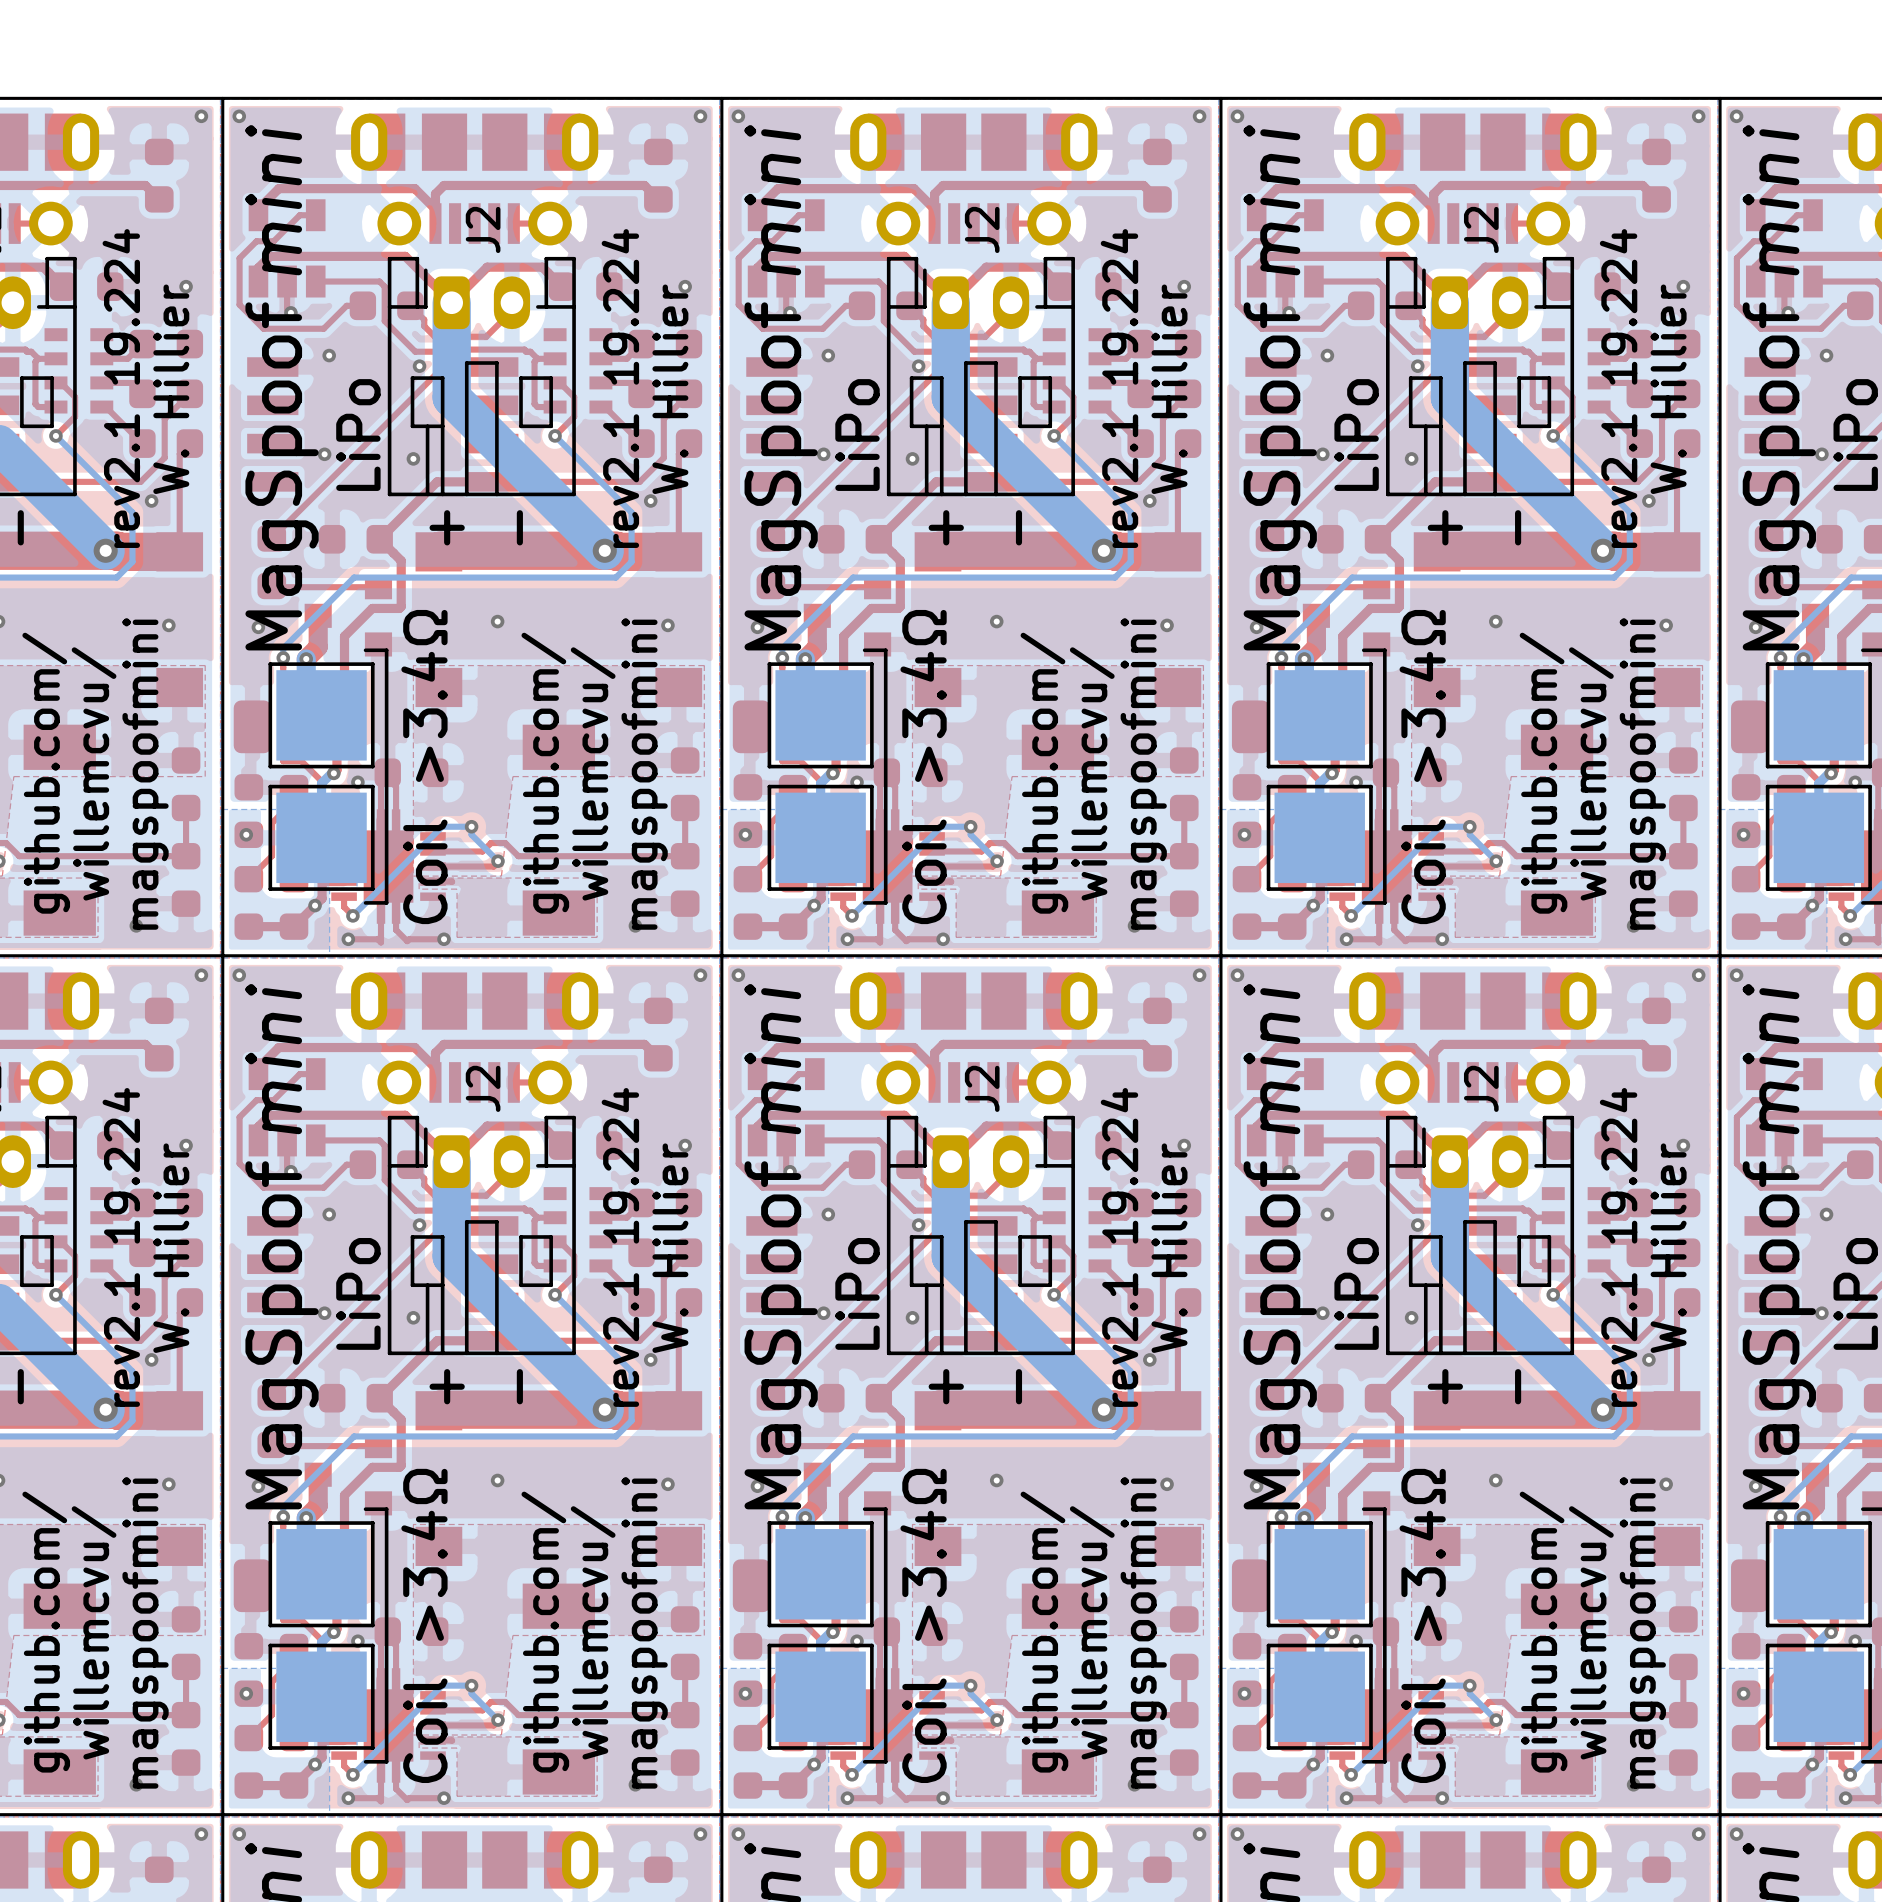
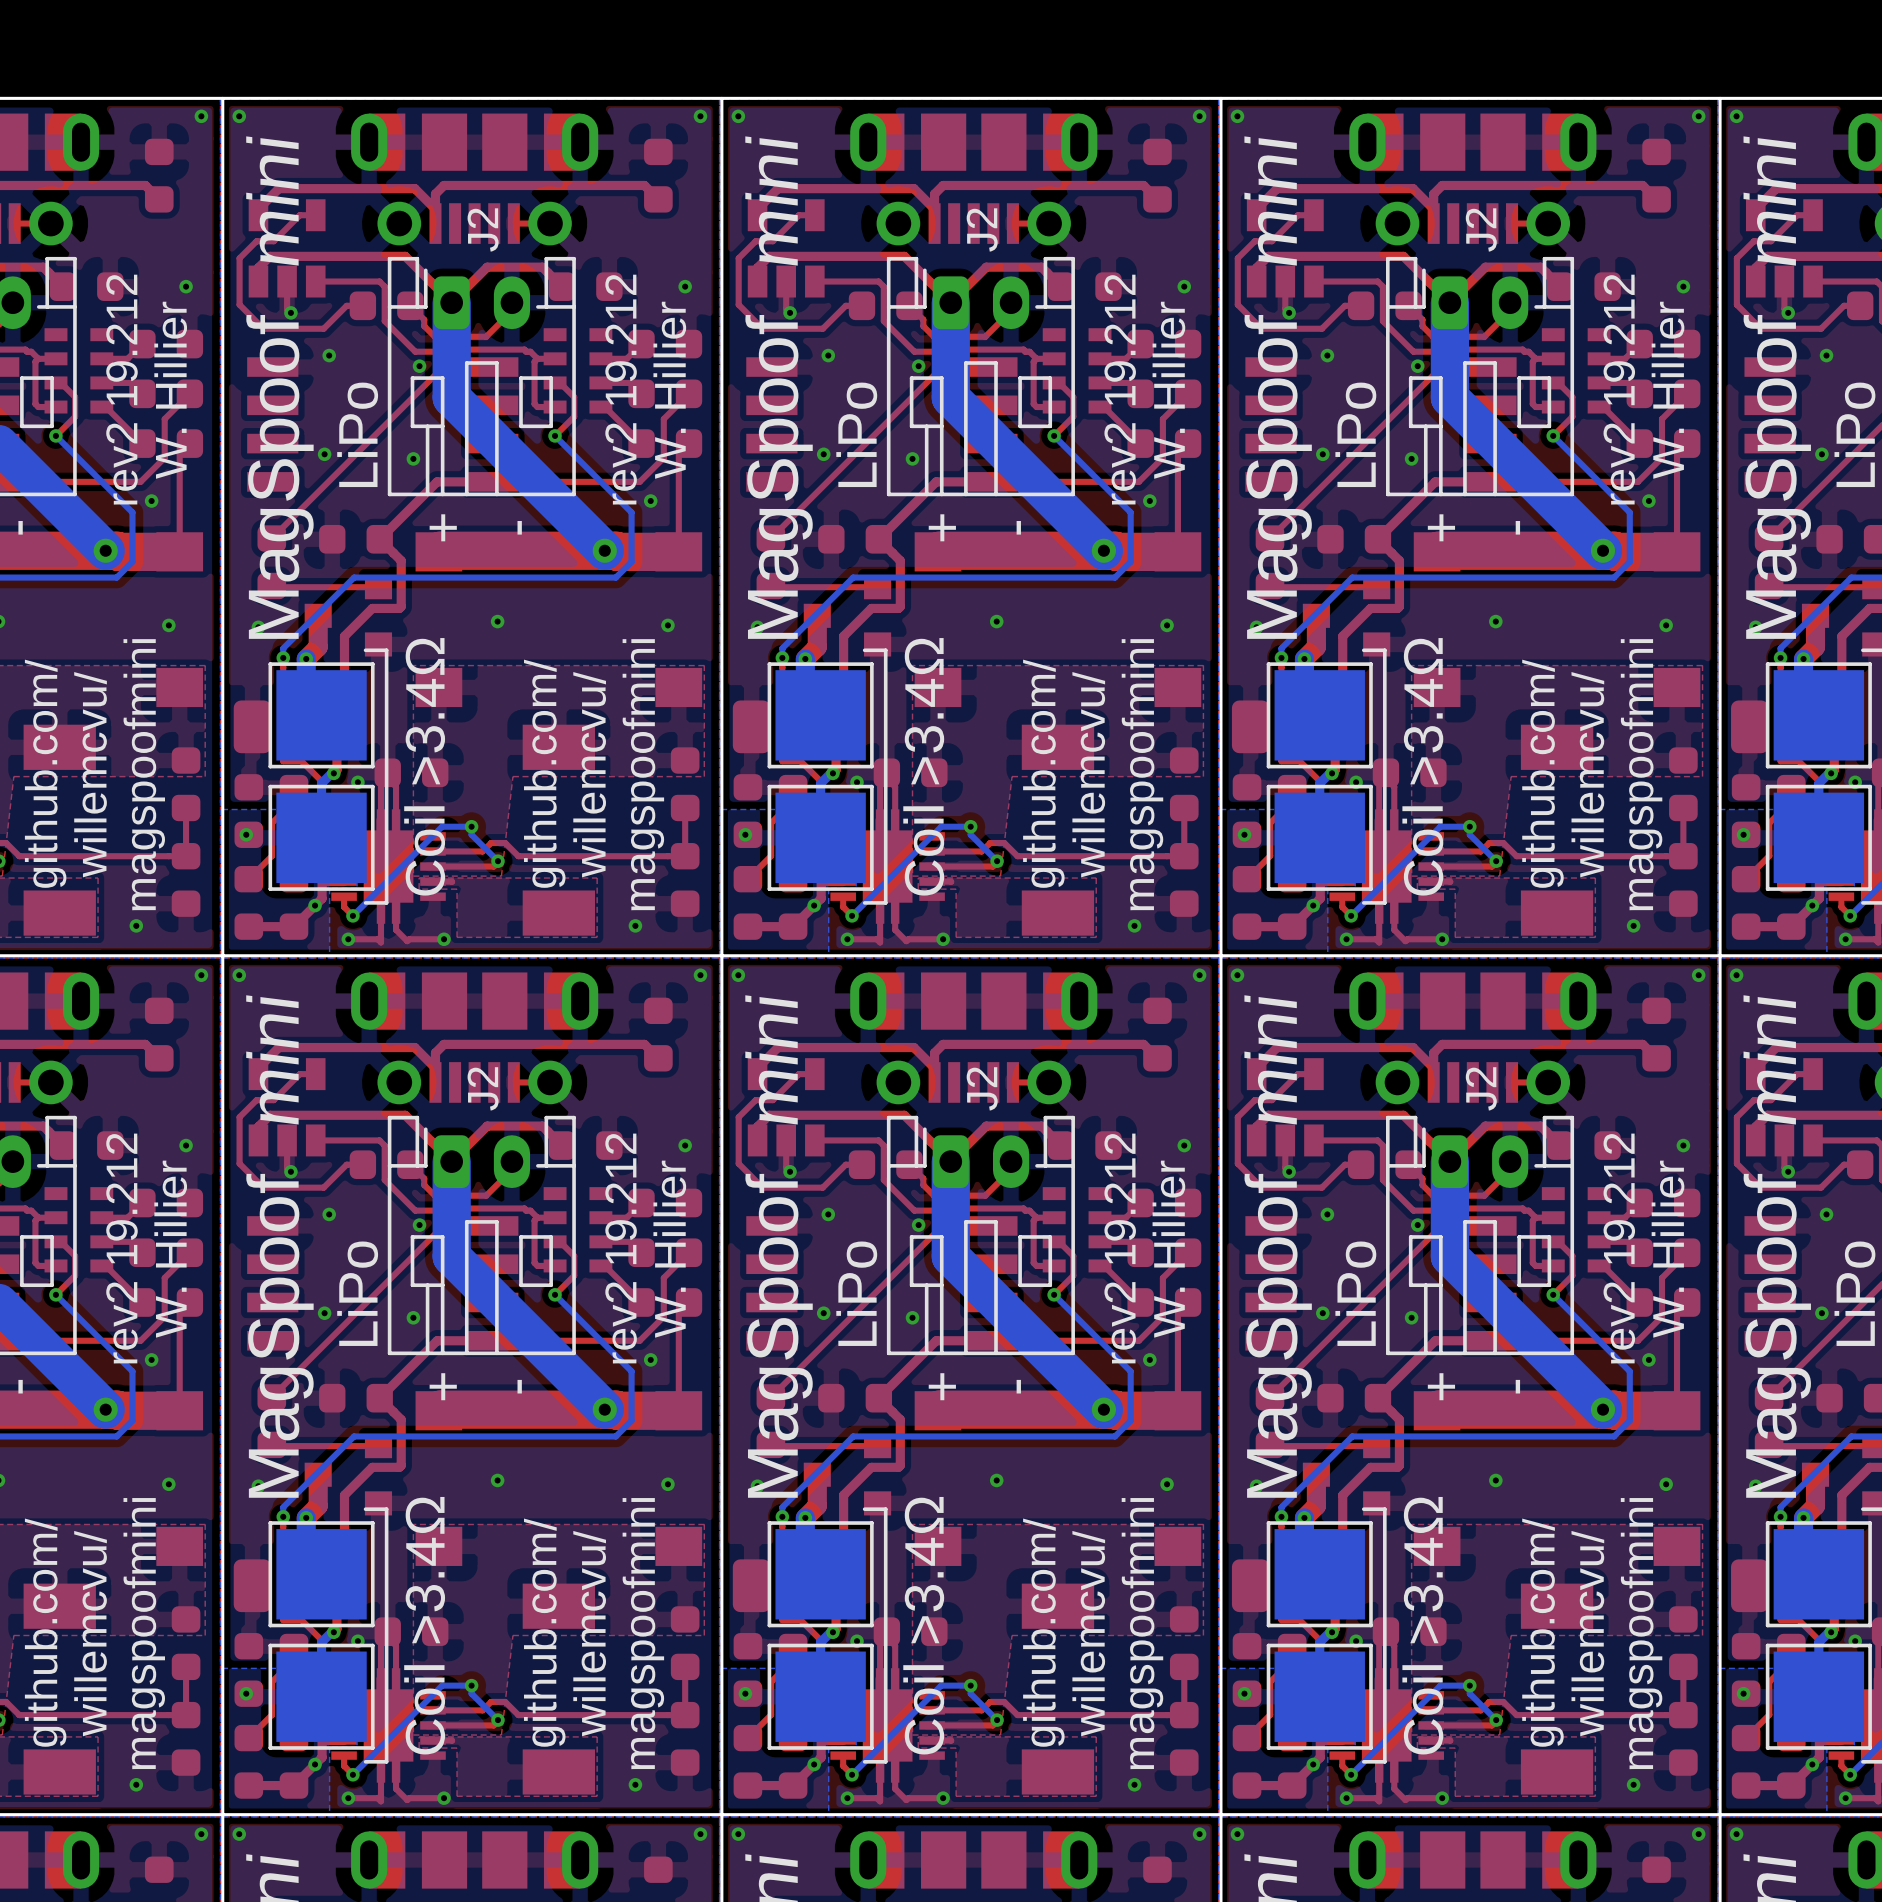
text: rev2.1 19.224 (121, 388) -> rev2 19.212 (121, 389)
text: rev2.1 19.224 (620, 388) -> rev2 19.212 (621, 389)
text: rev2.1 19.224 (1119, 388) -> rev2 19.212 (1120, 389)
text: rev2.1 19.224 (1618, 388) -> rev2 19.212 (1619, 389)
text: rev2.1 19.224 (121, 1247) -> rev2 19.212 (121, 1248)
text: rev2.1 19.224 (620, 1247) -> rev2 19.212 (621, 1248)
text: rev2.1 19.224 (1119, 1247) -> rev2 19.212 (1120, 1248)
text: rev2.1 19.224 (1618, 1247) -> rev2 19.212 (1619, 1248)

